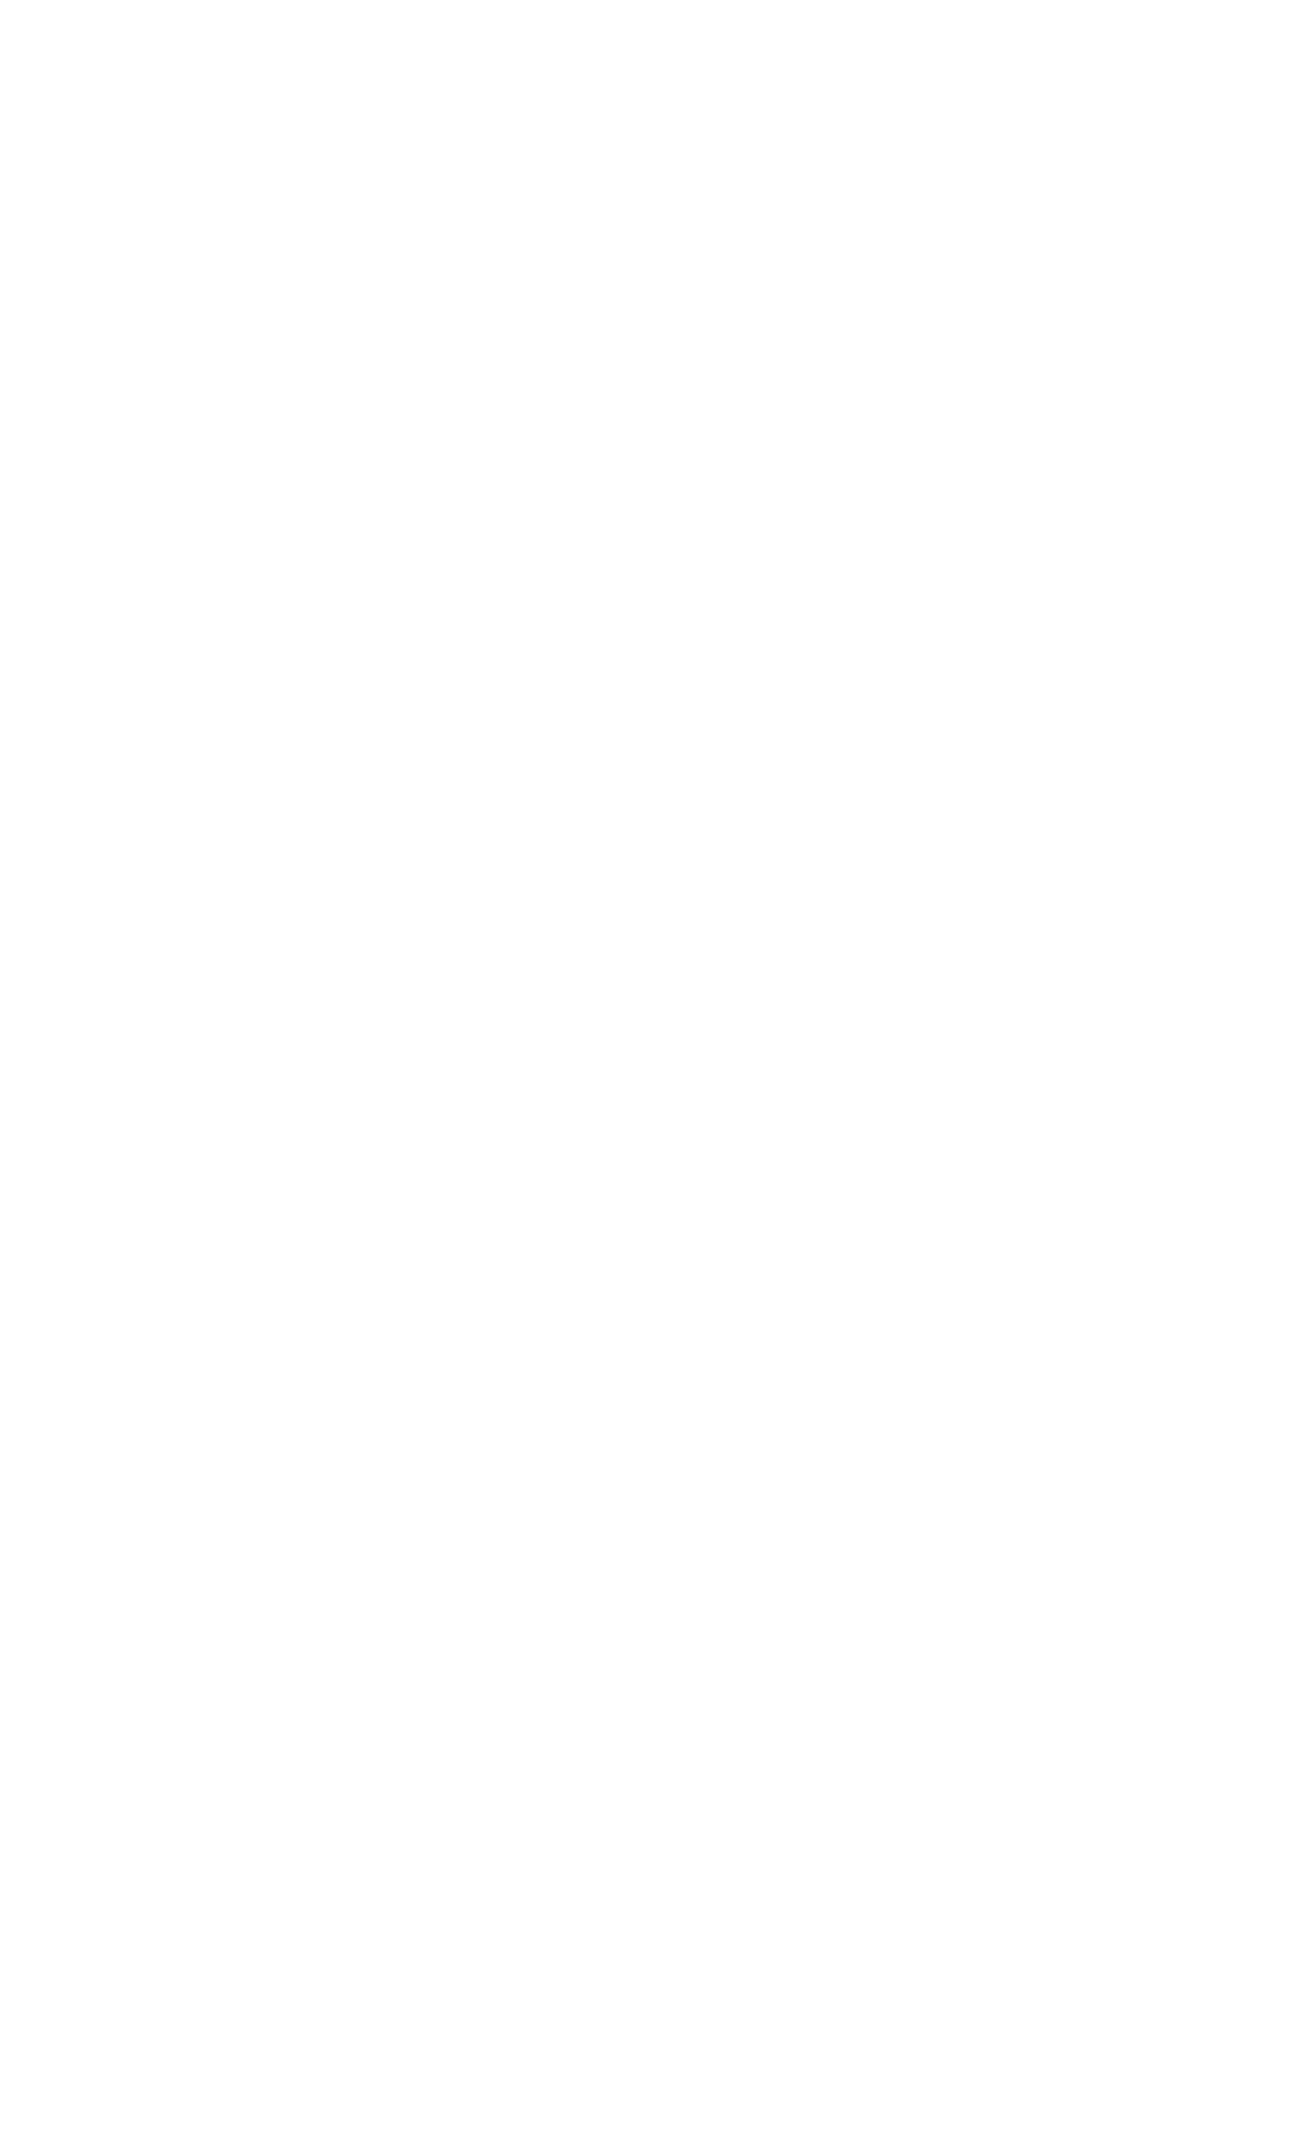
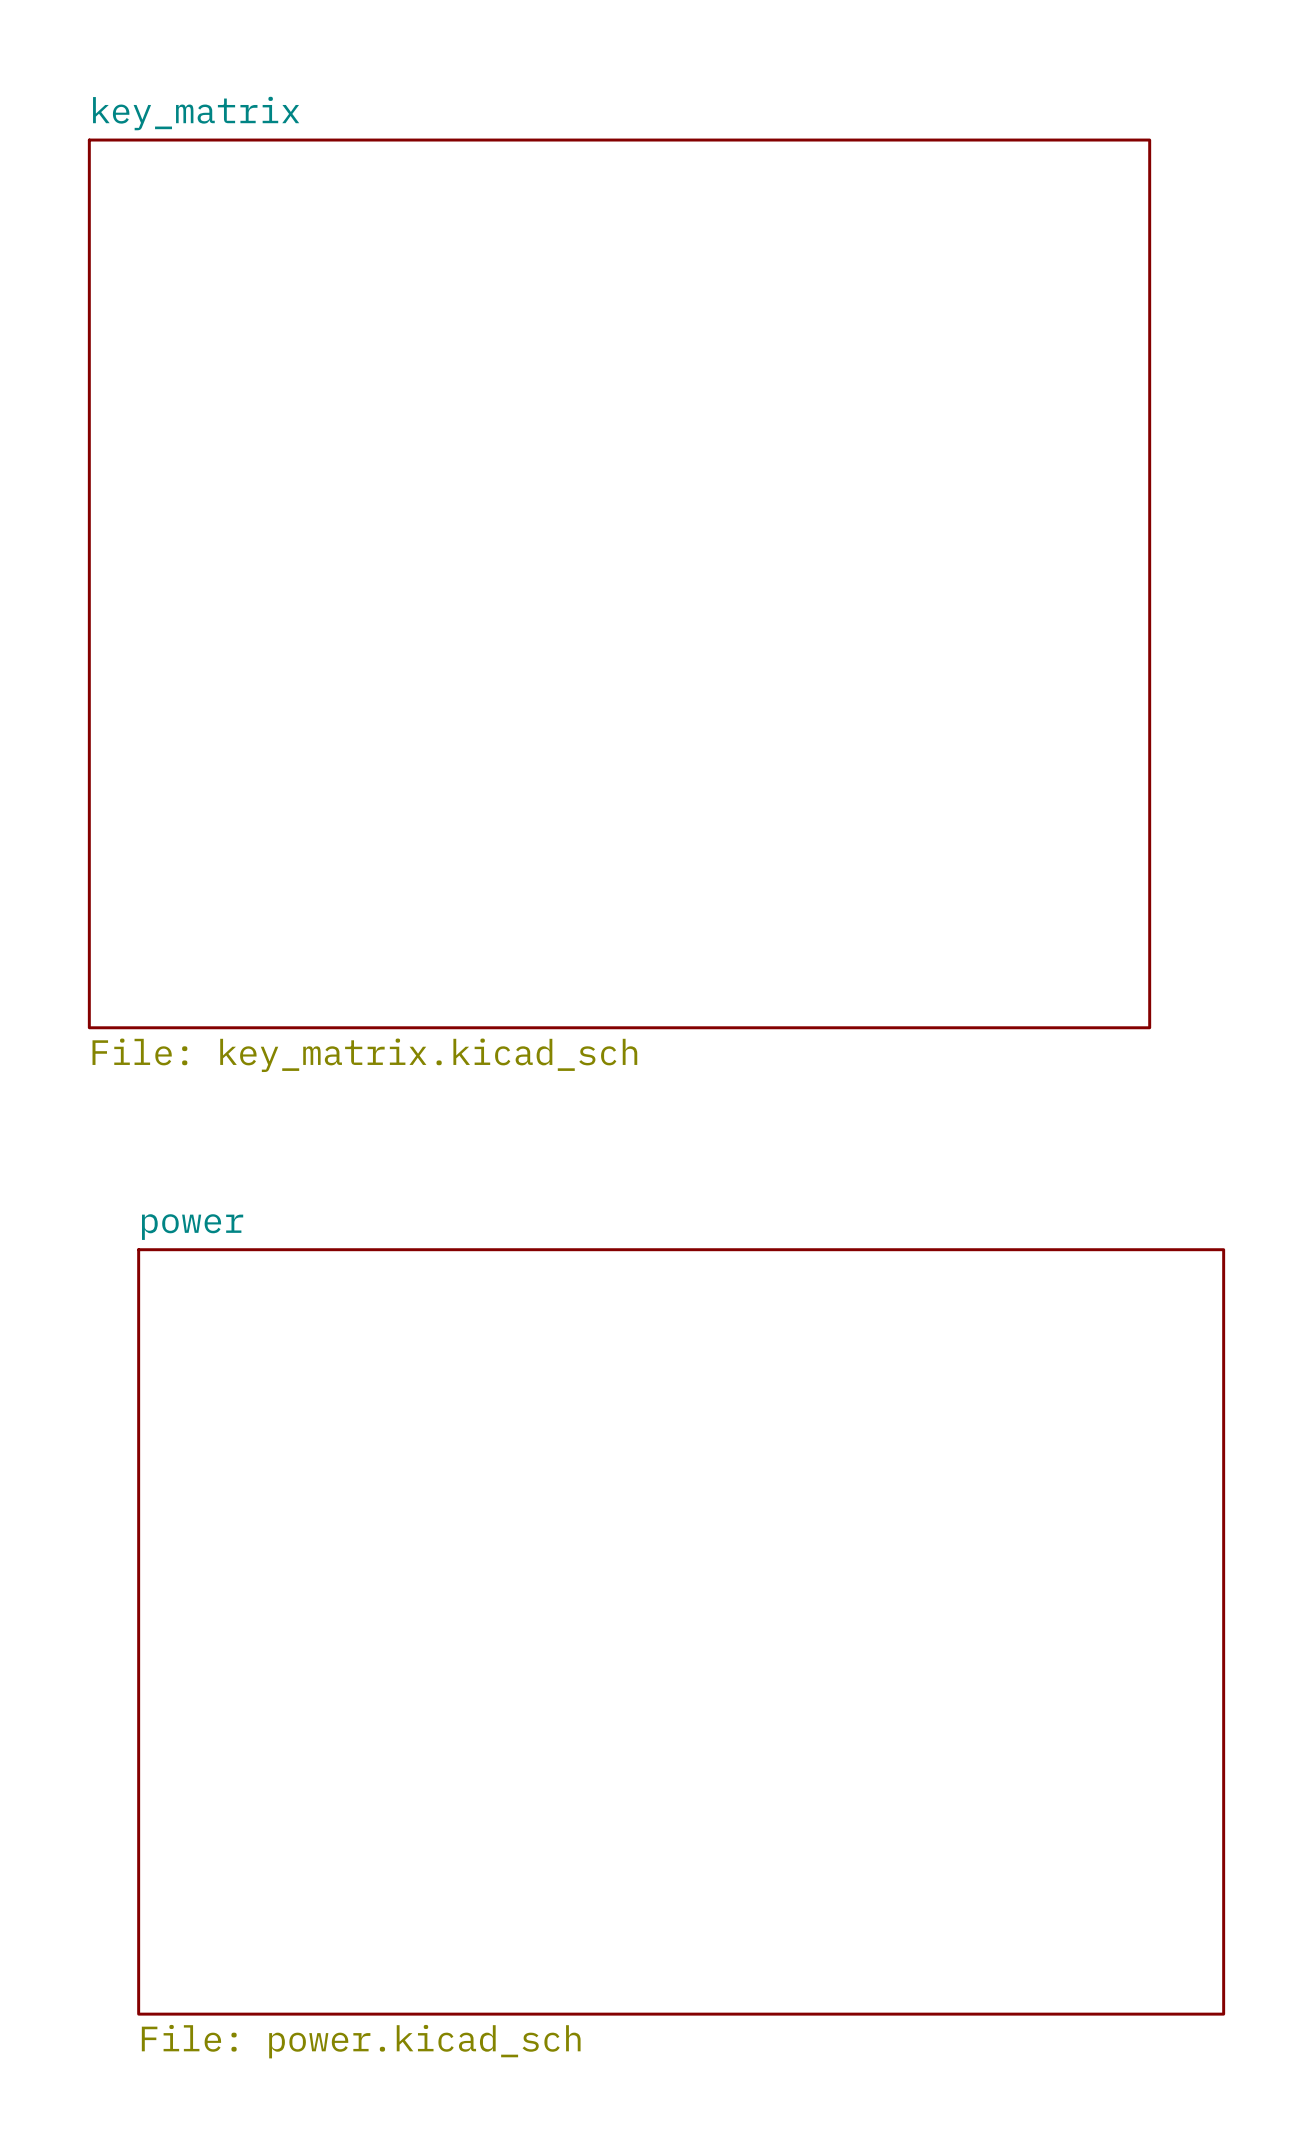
sheet key_matrix: none -> File: key_matrix.kicad_sch (619, 583)
sheet power: none -> File: power.kicad_sch (681, 1631)

